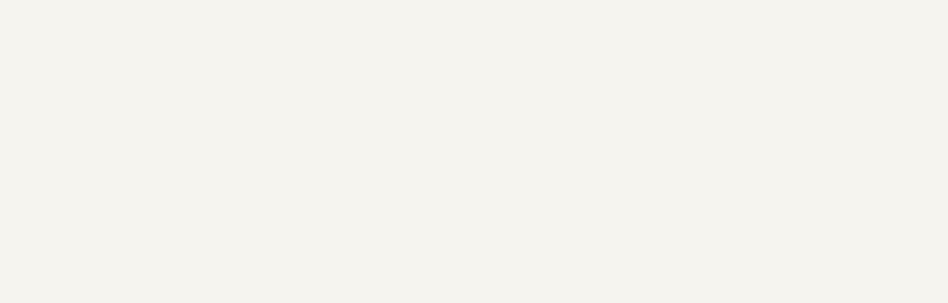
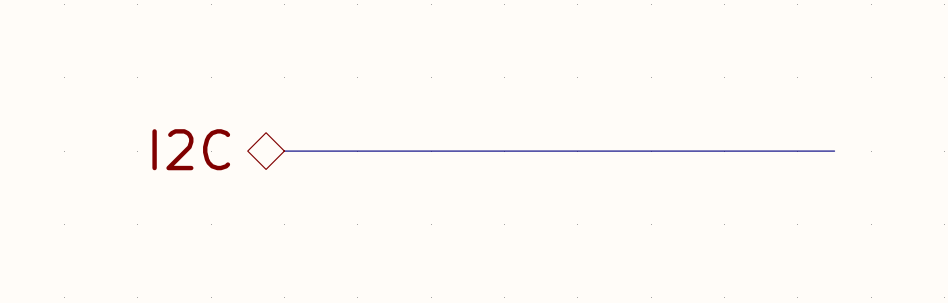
hierarchical label: none -> I2C (191, 149)
bus: none -> (284, 151) (834, 151)

